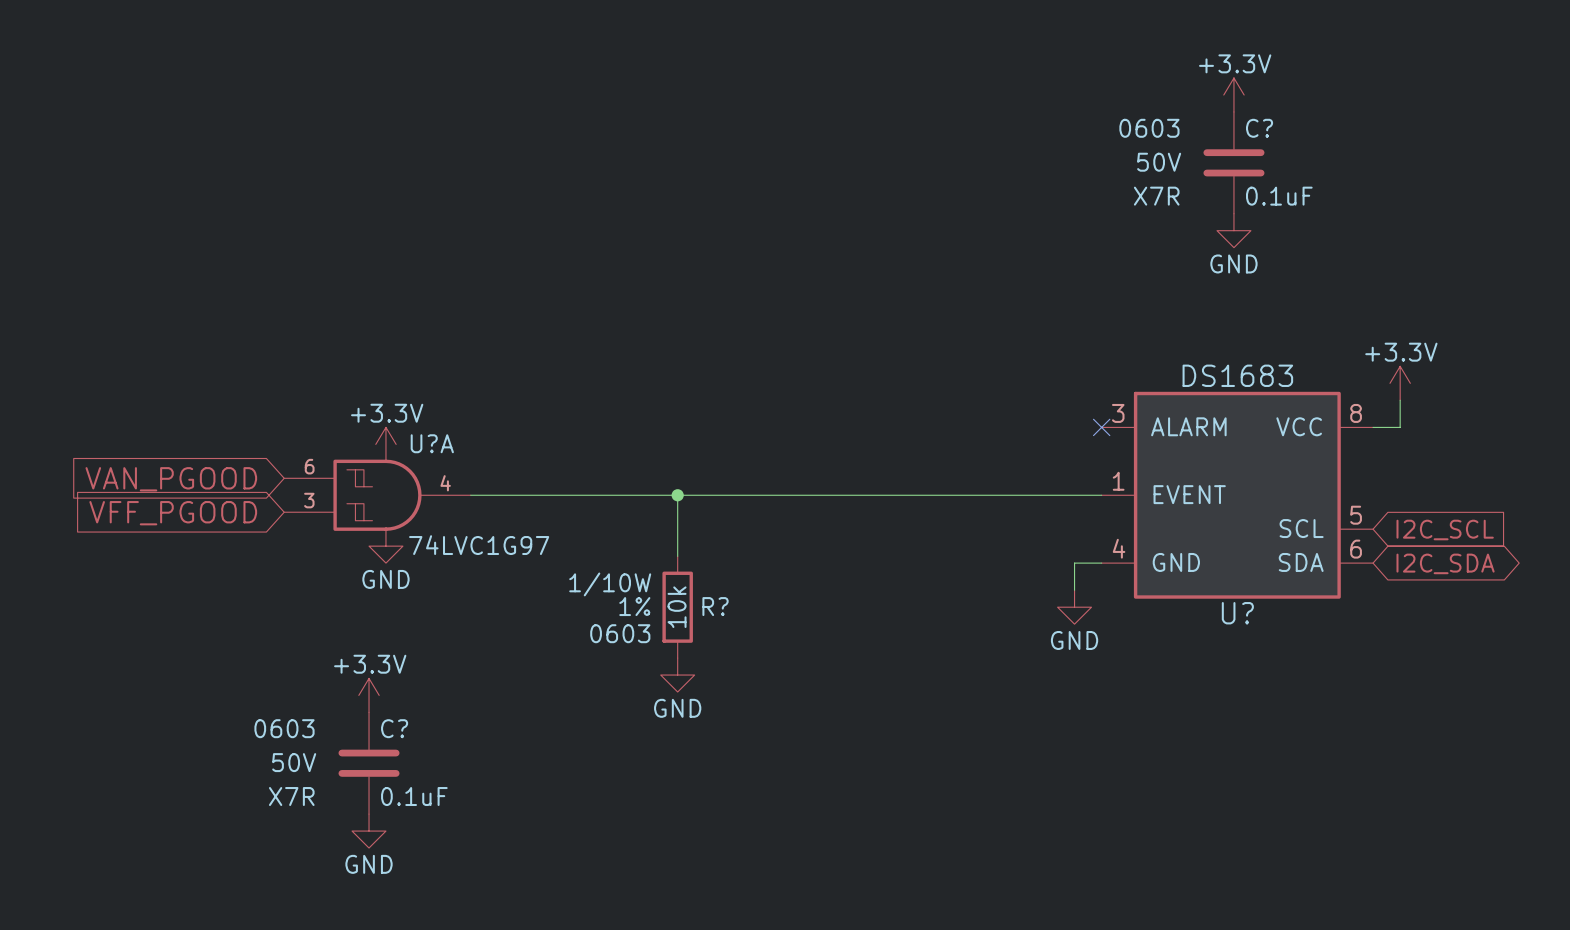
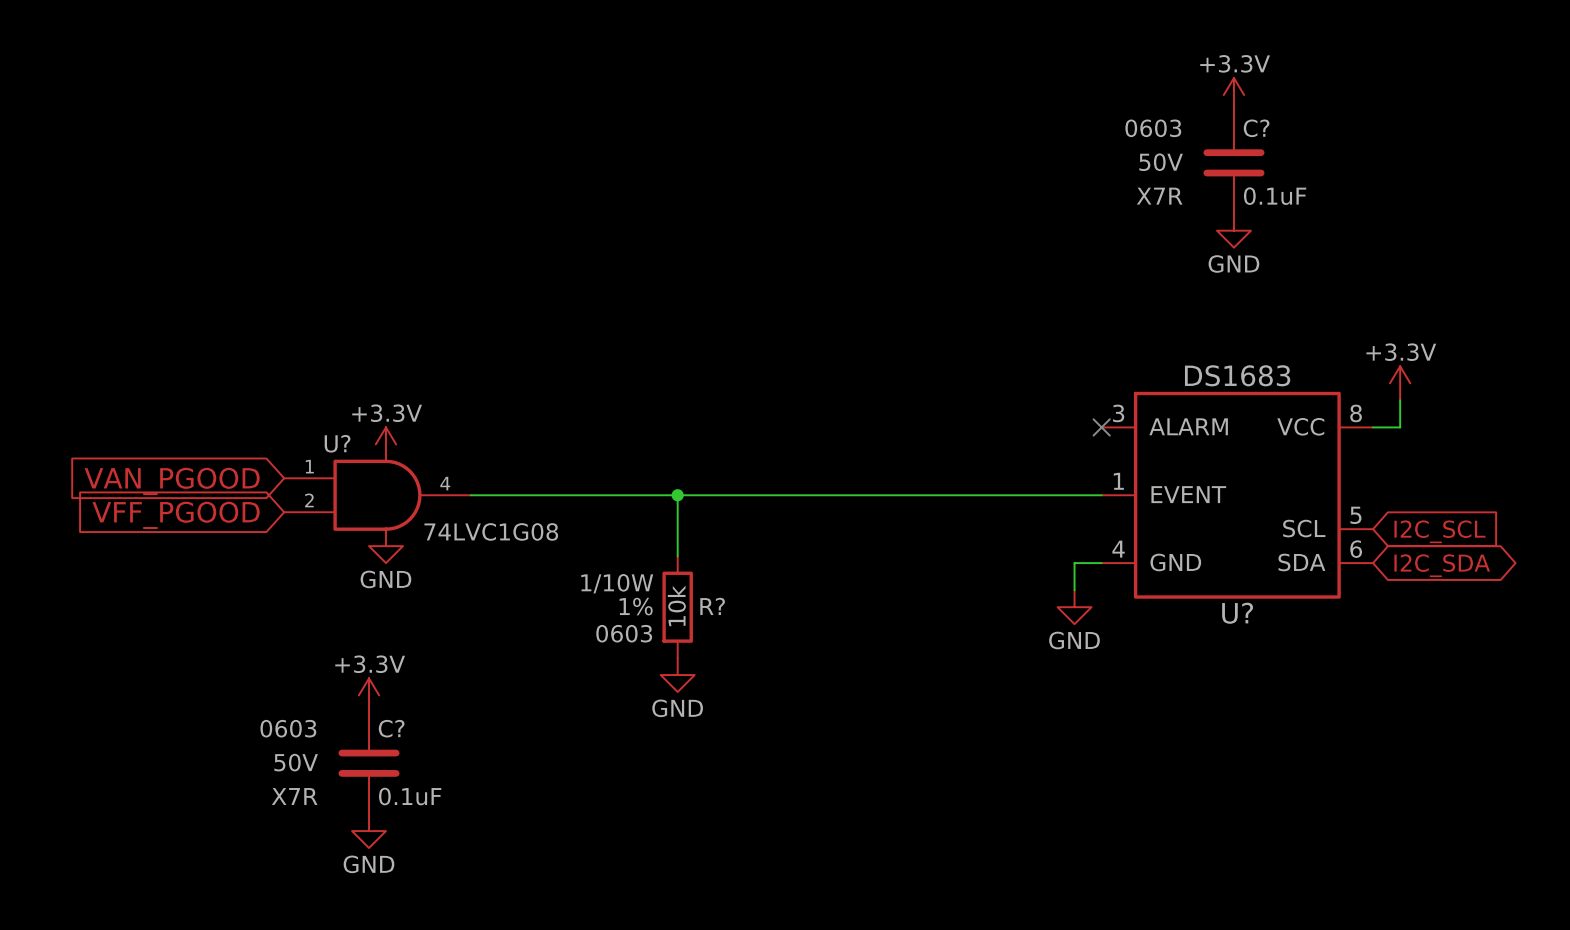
U?A: 74LVC1G97 (377, 495) -> none
U?: none -> 74LVC1G08 (377, 495)

